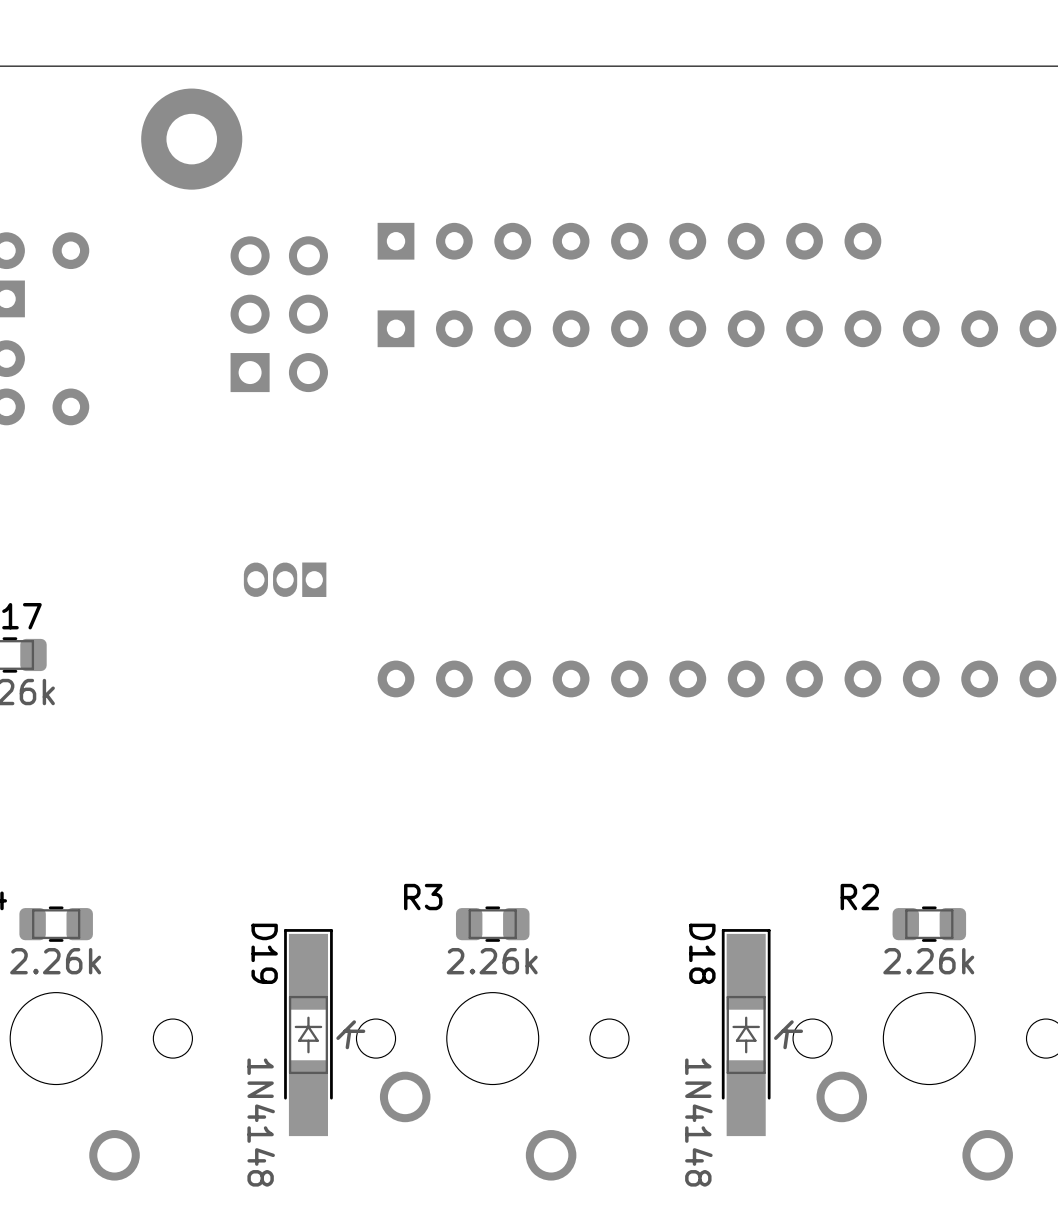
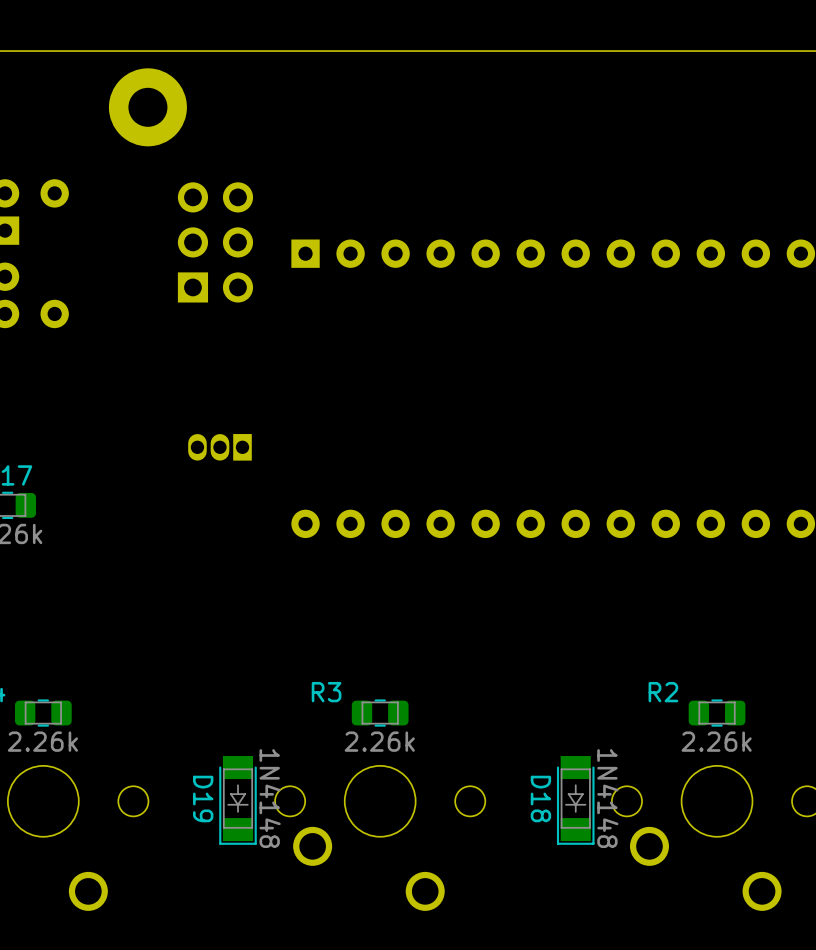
part: (629, 241) -> none
D19 footprint: [284, 929, 333, 1137] -> [219, 756, 257, 845]
D18 footprint: [721, 929, 771, 1137] -> [556, 756, 595, 845]
D19 name position: D19 (264, 953) -> D19 (203, 798)
D18 name position: D18 (702, 953) -> D18 (540, 798)
D19 value position: 1N4148 (261, 1122) -> 1N4148 (270, 798)
D18 value position: 1N4148 (698, 1122) -> 1N4148 (607, 798)

